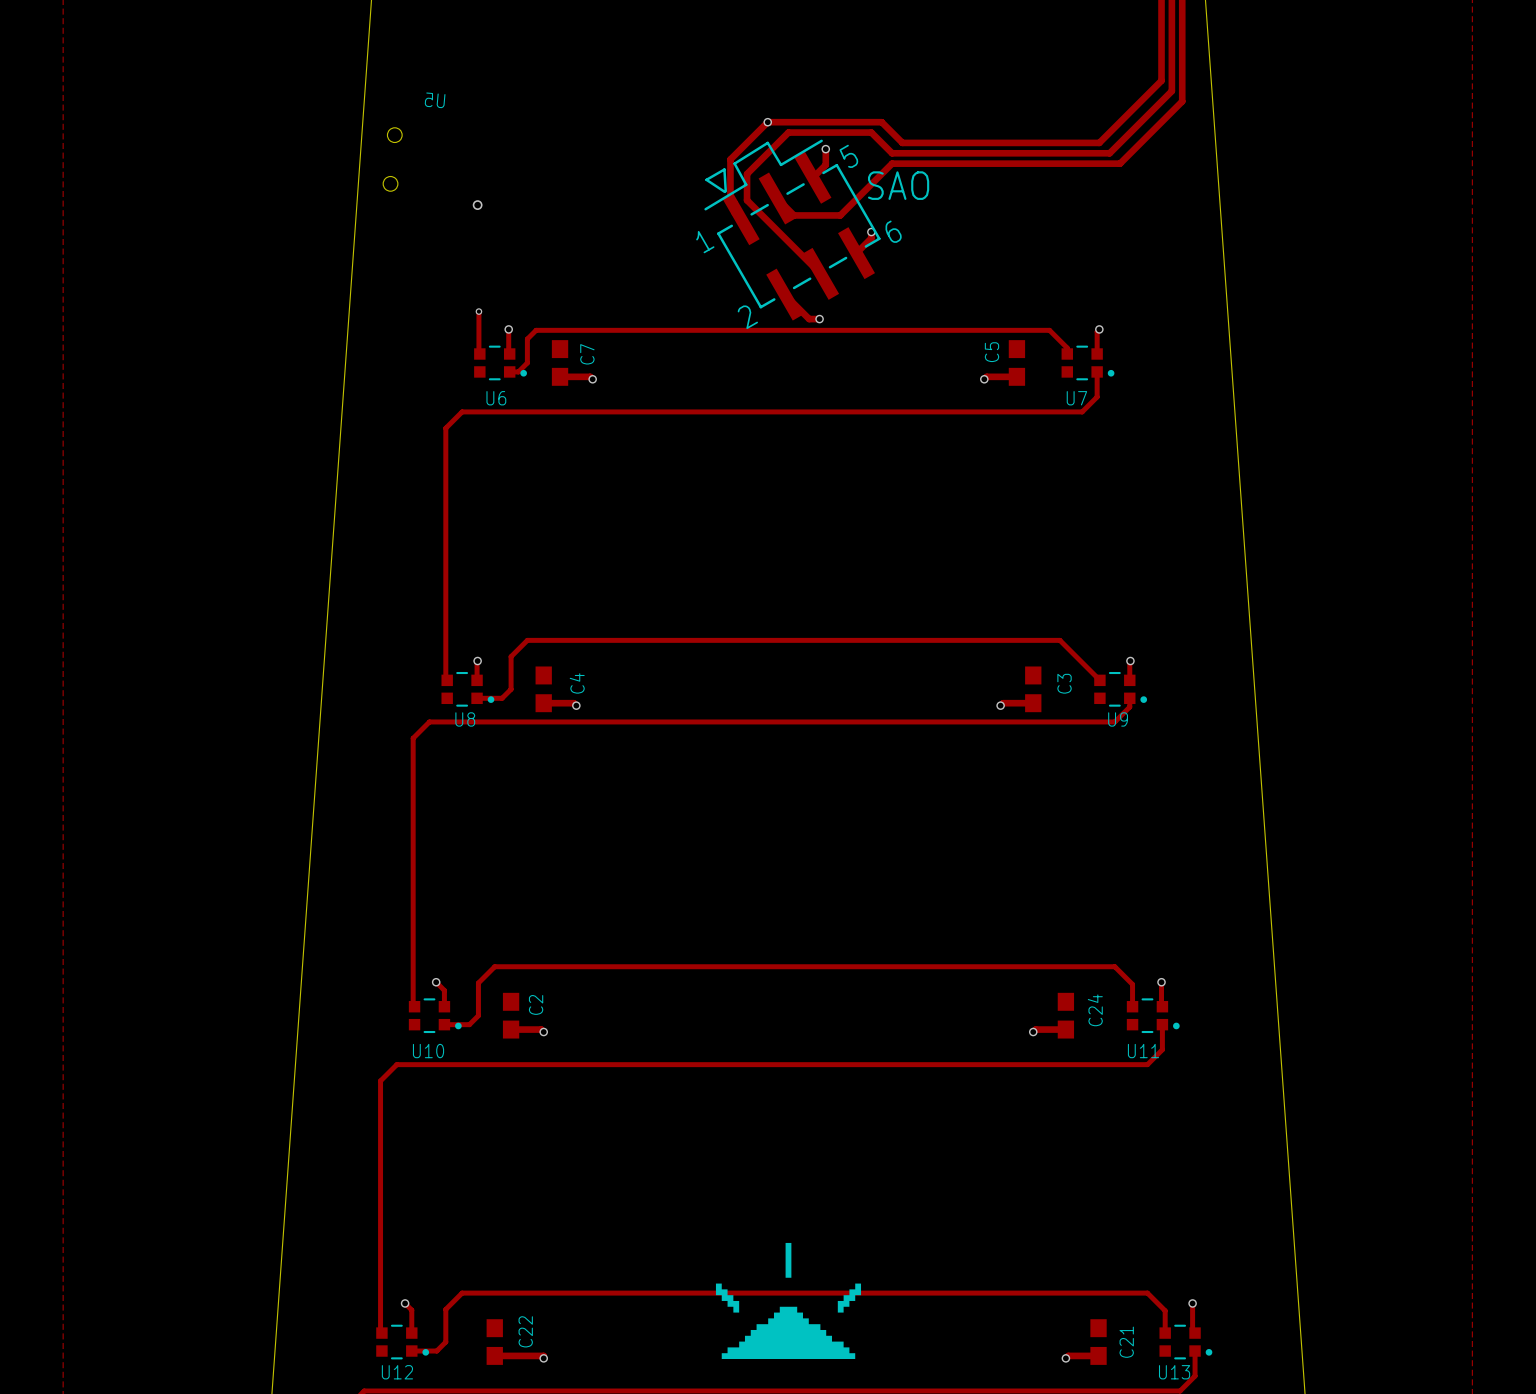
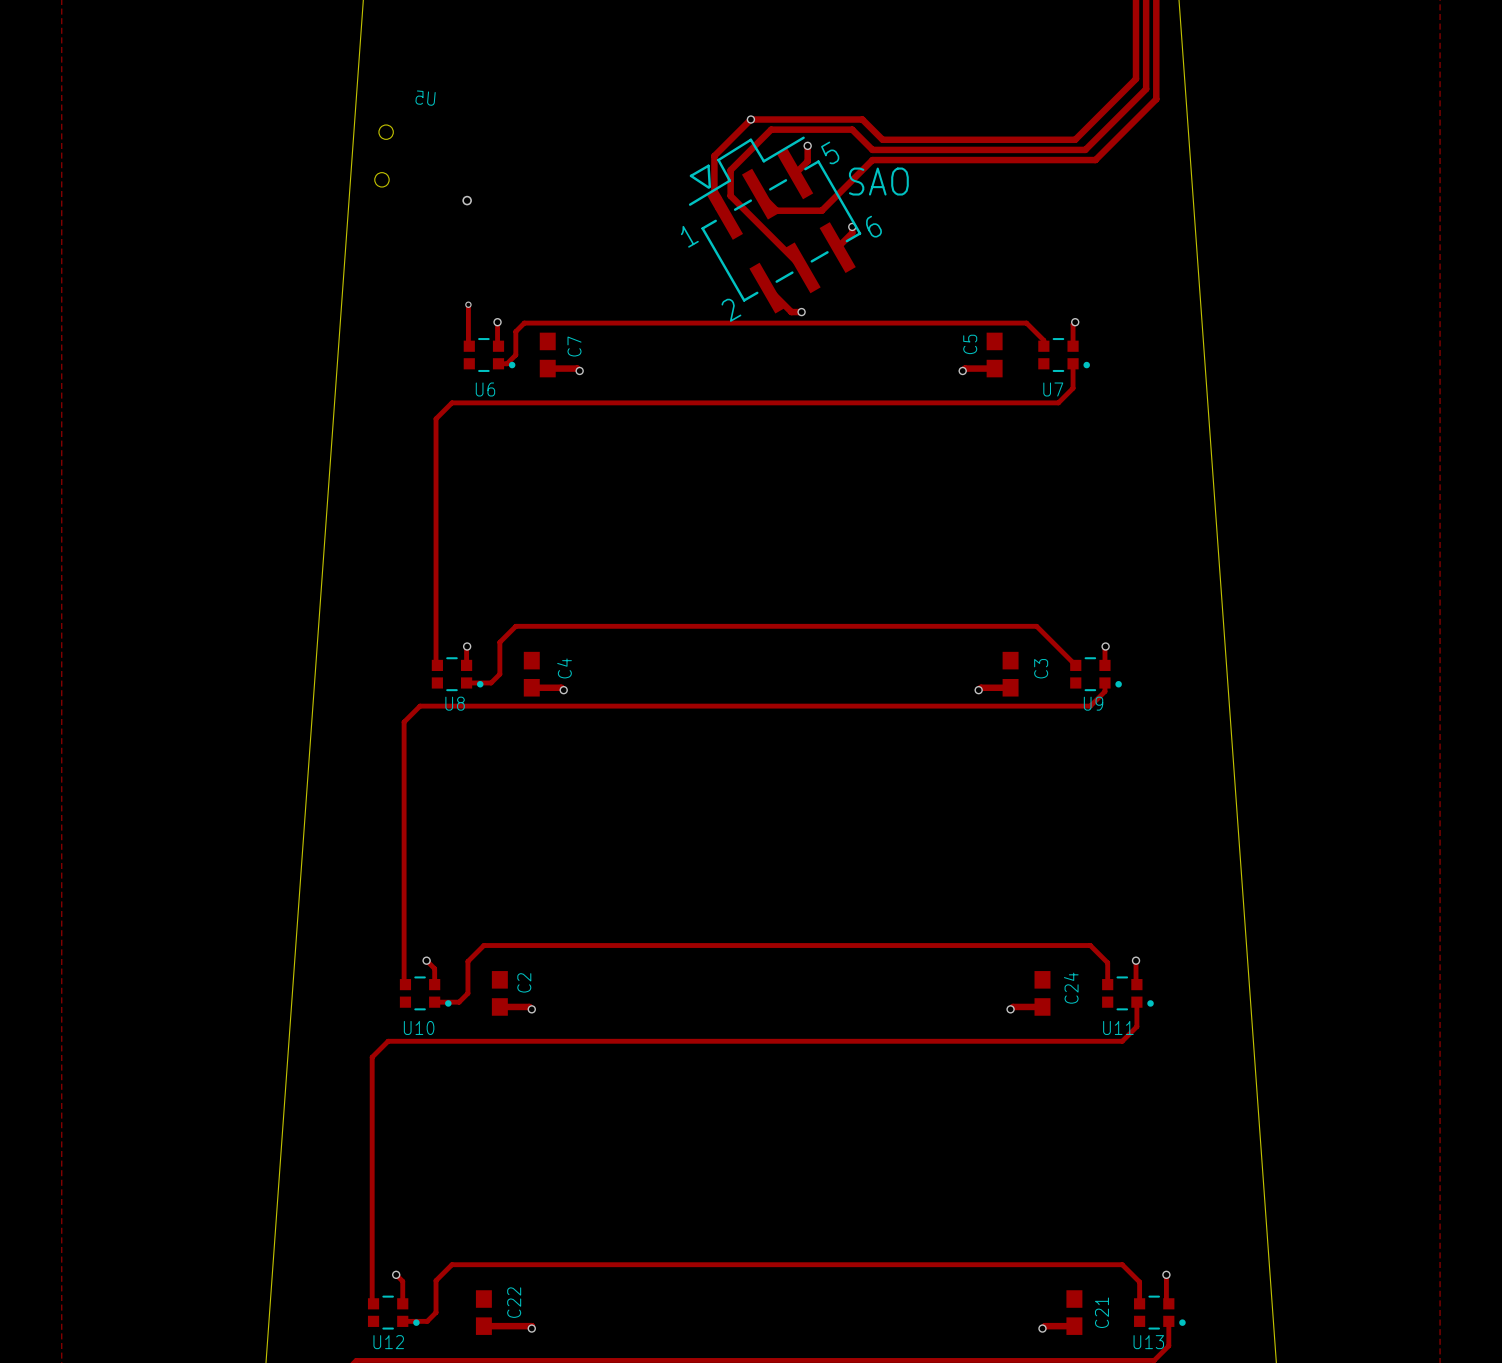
drawing: [785, 1242, 792, 1278] -> none
drawing: [715, 1283, 740, 1313] -> none
drawing: [837, 1283, 862, 1313] -> none
drawing: [721, 1306, 856, 1359] -> none

